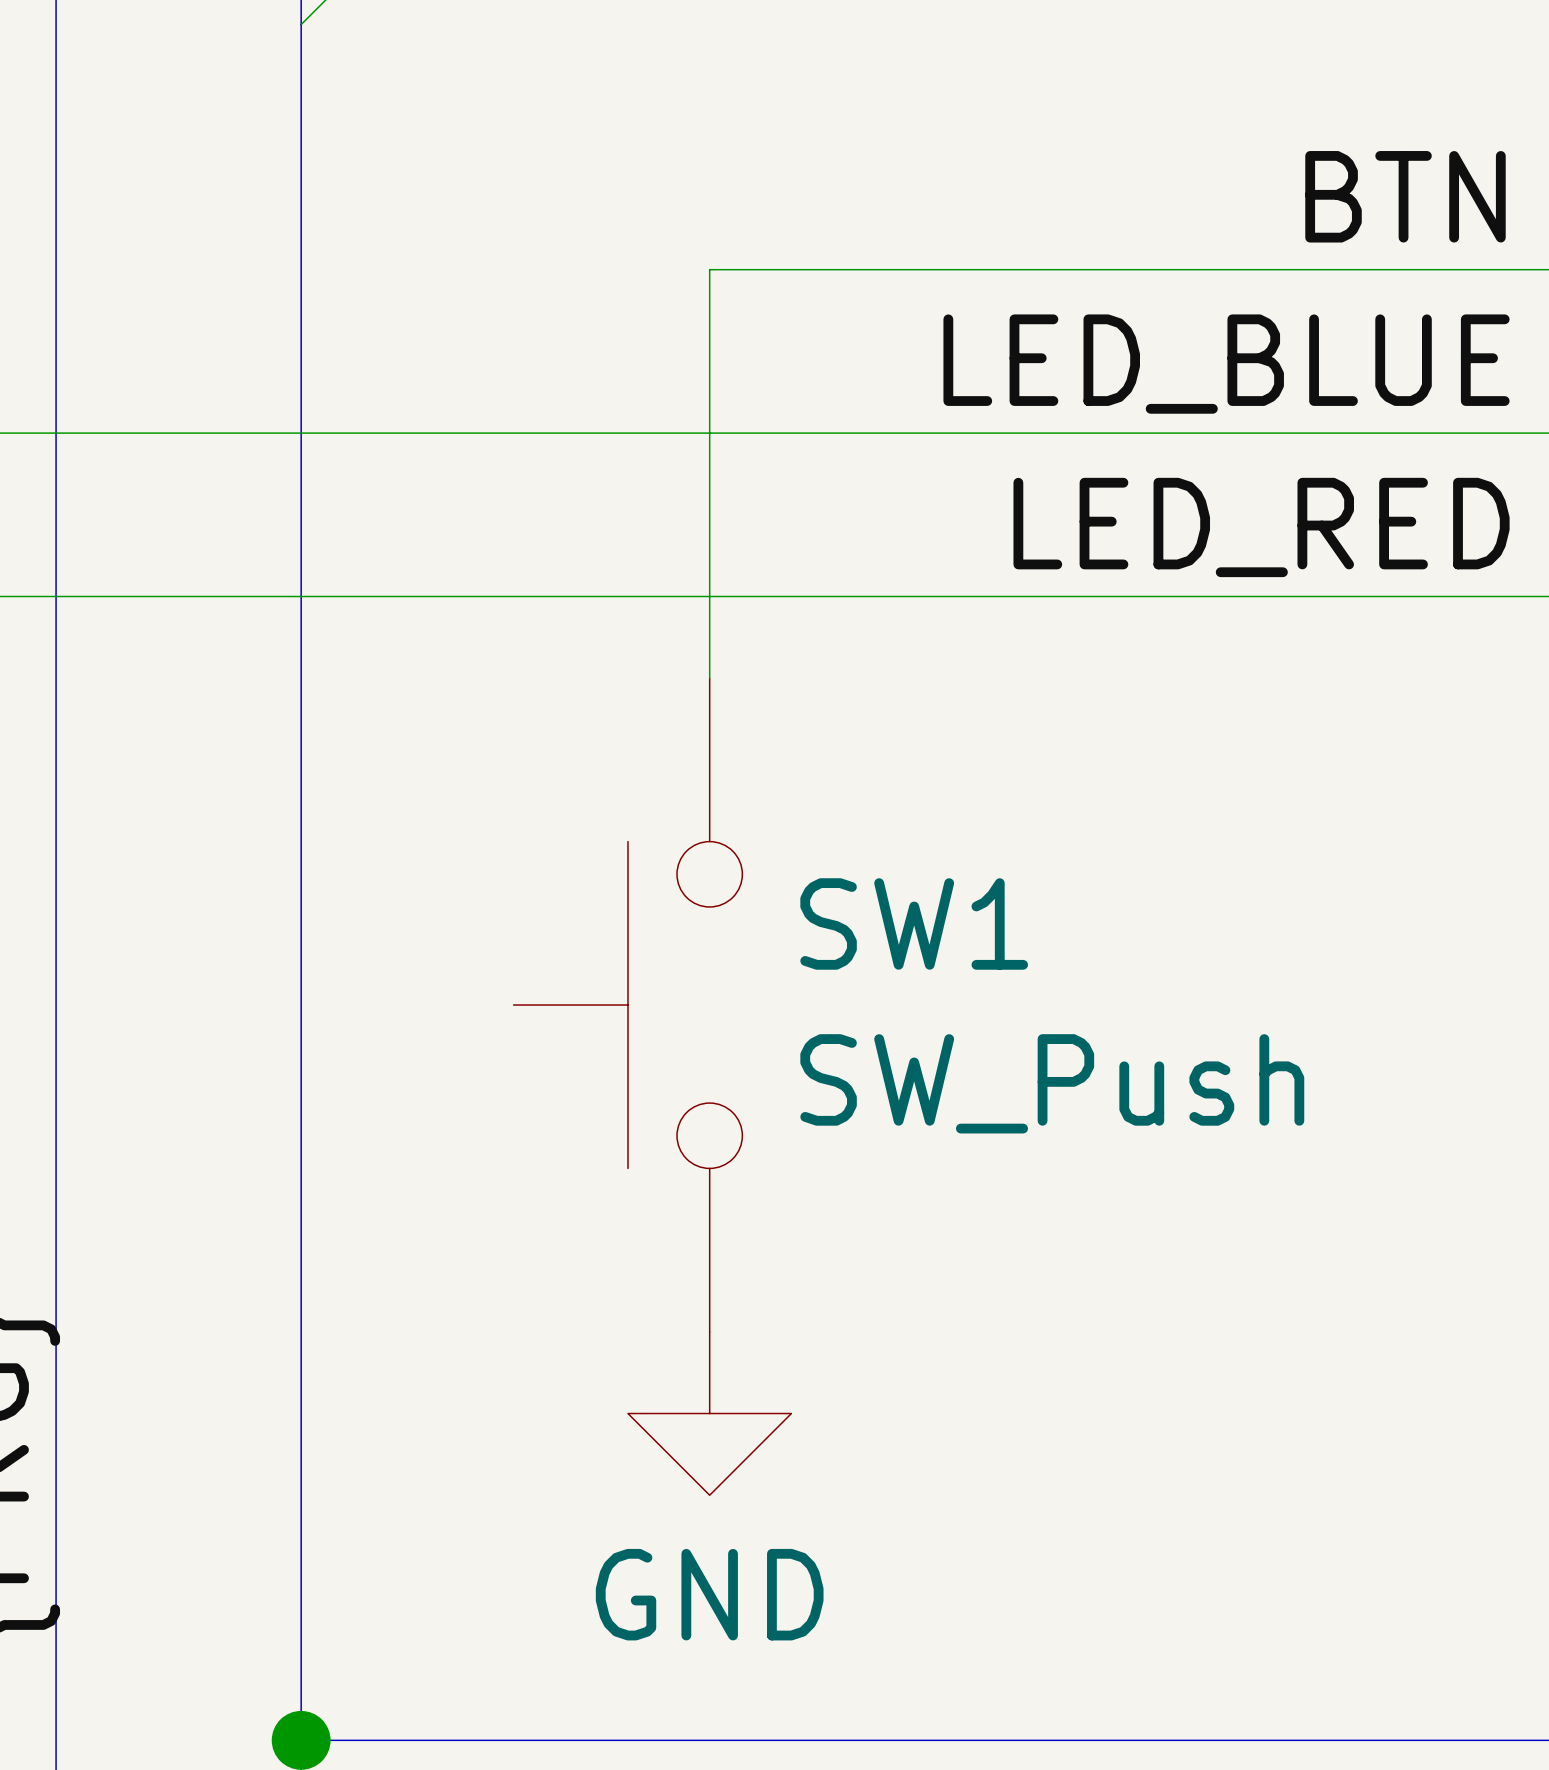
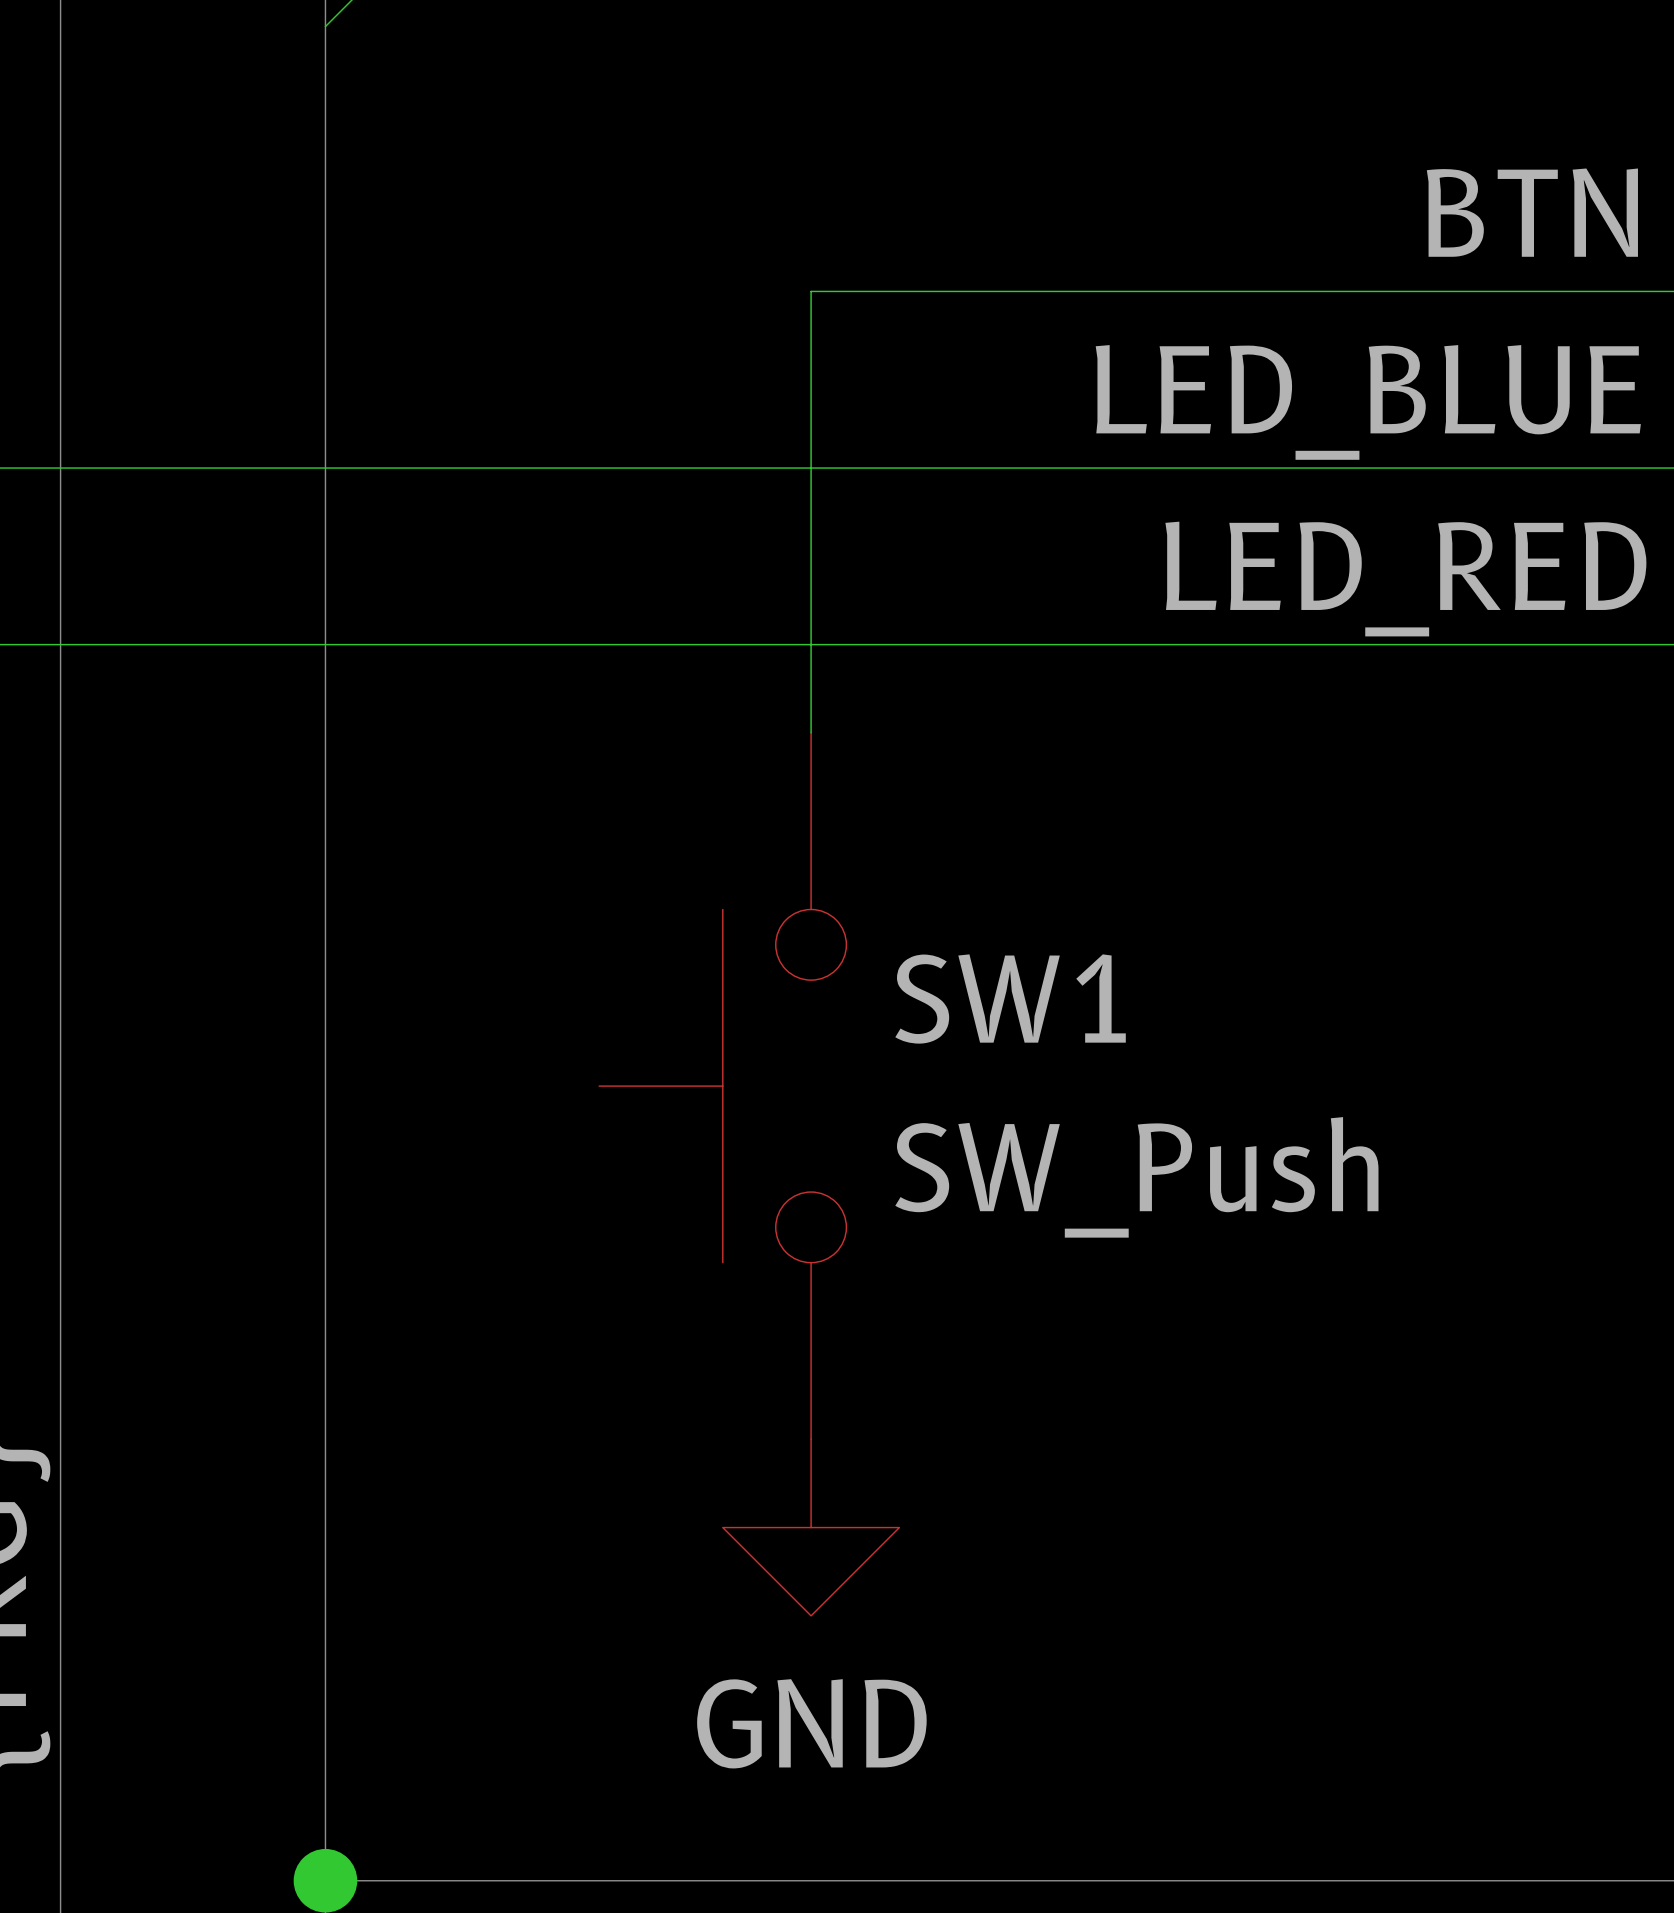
wire: (750, 269) (709, 269) (709, 678) -> (811, 291) (811, 732)
SW1 position: (627, 1005) -> (722, 1086)
power symbol position: GND (709, 1413) -> GND (811, 1527)

